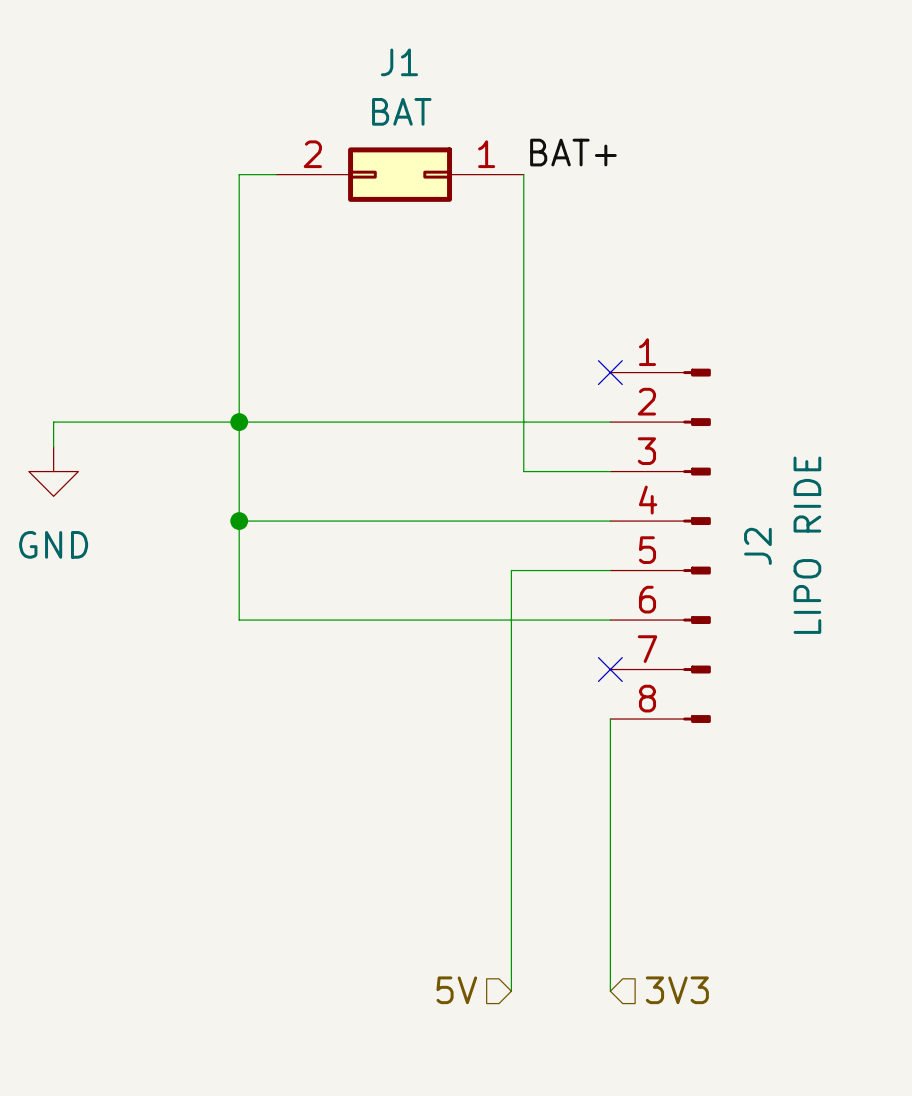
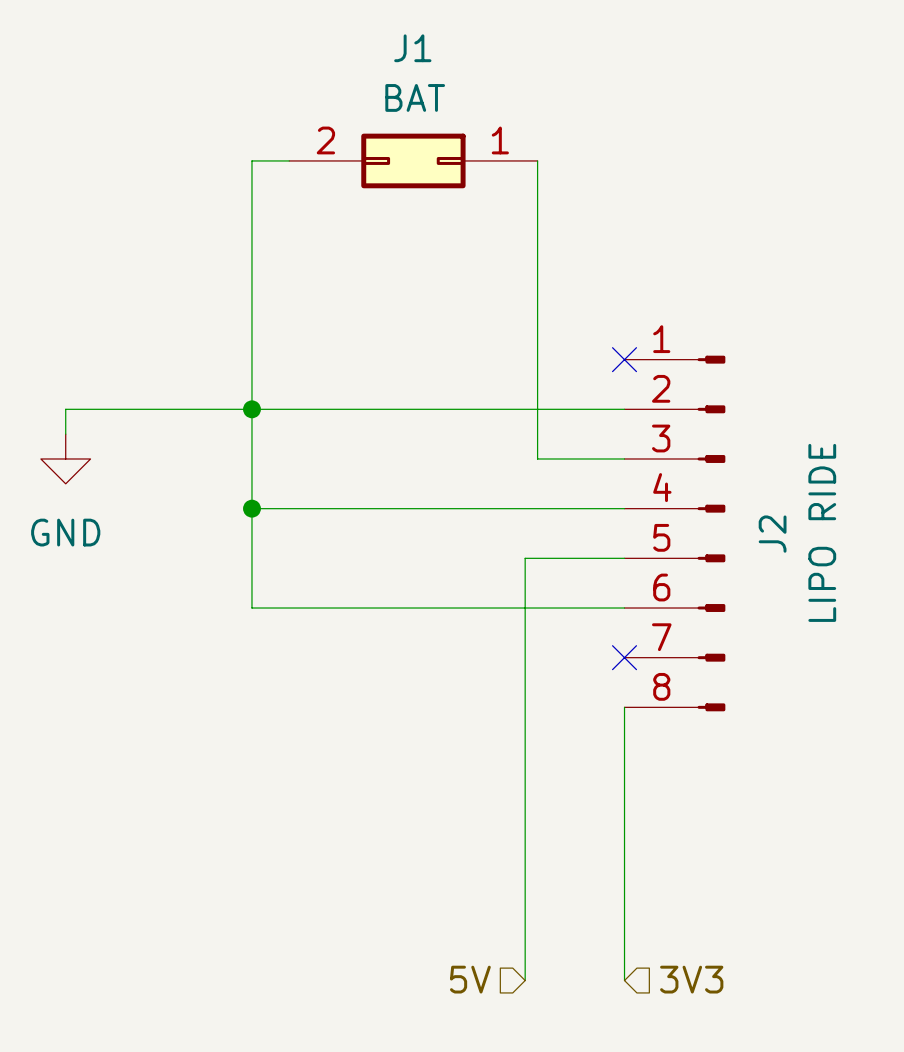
label: BAT+ (573, 152) -> none

